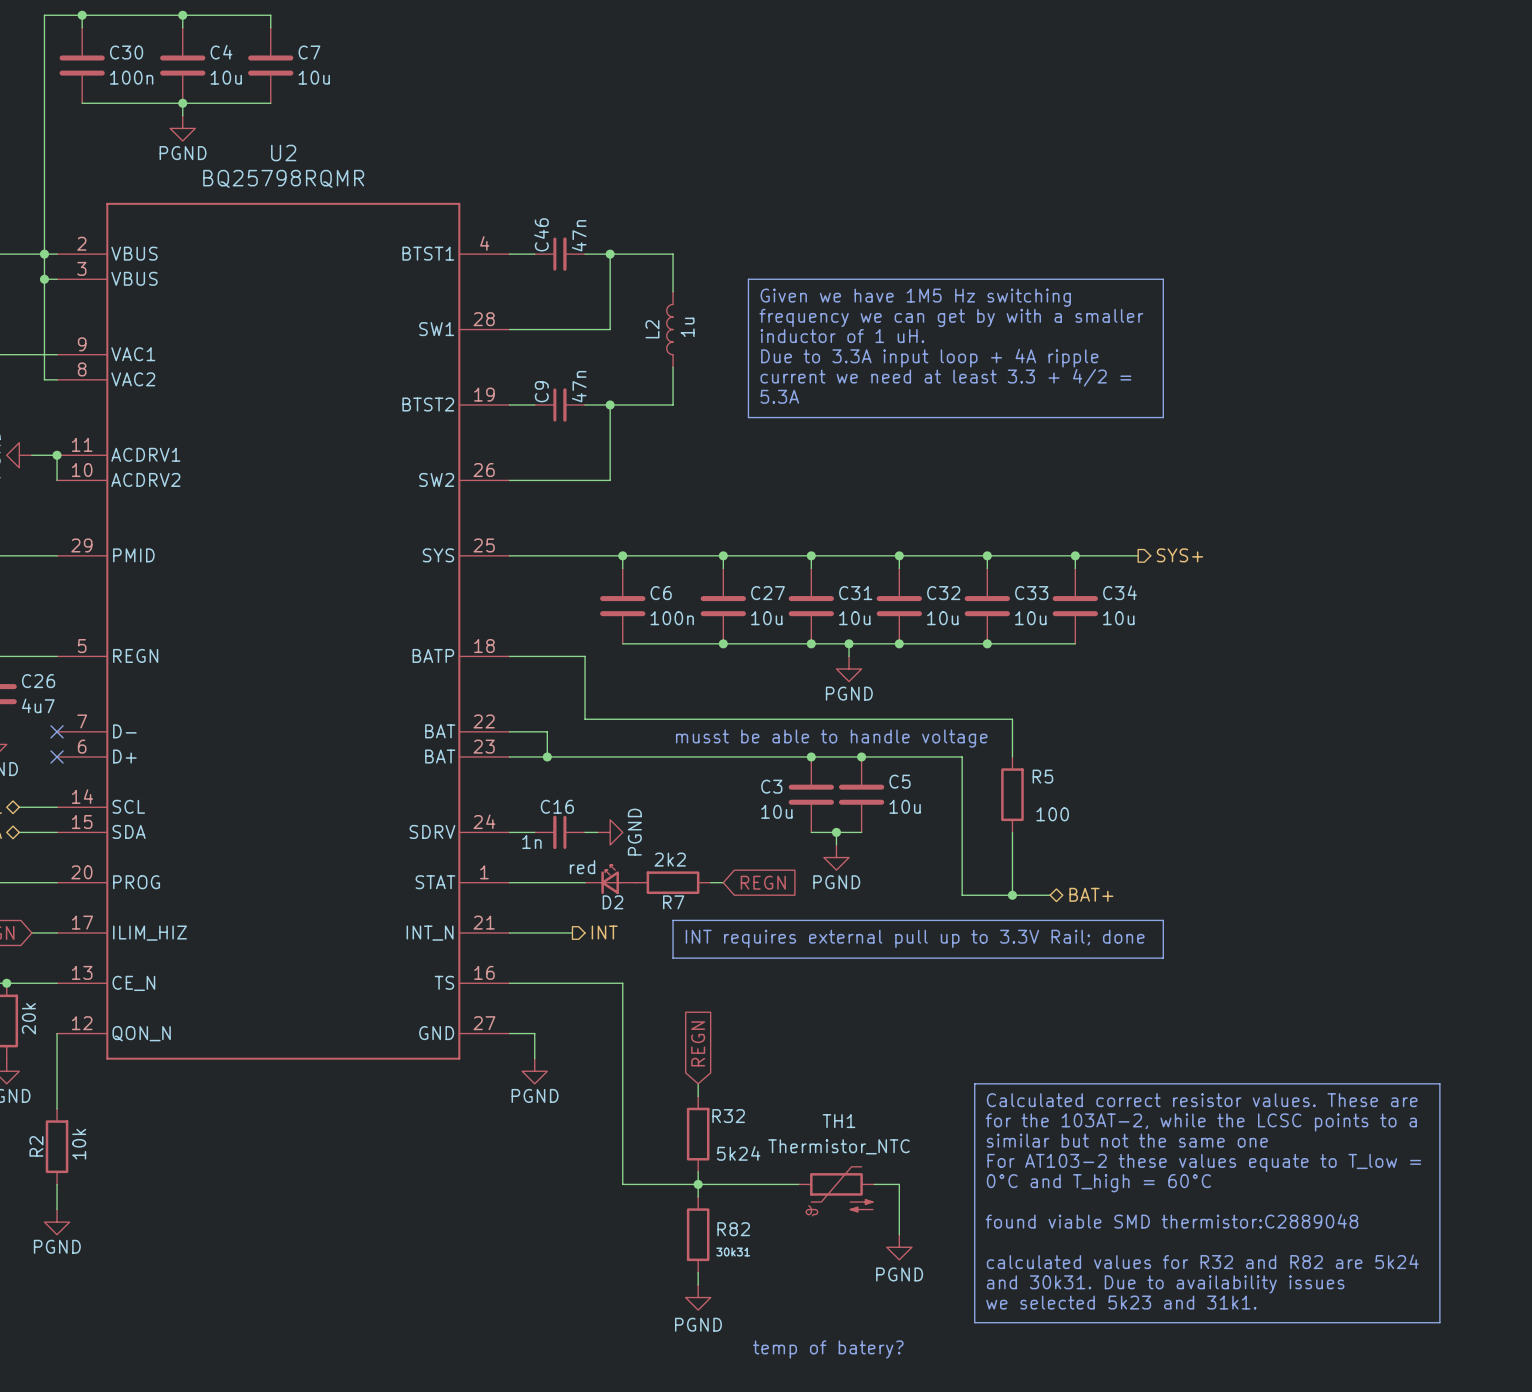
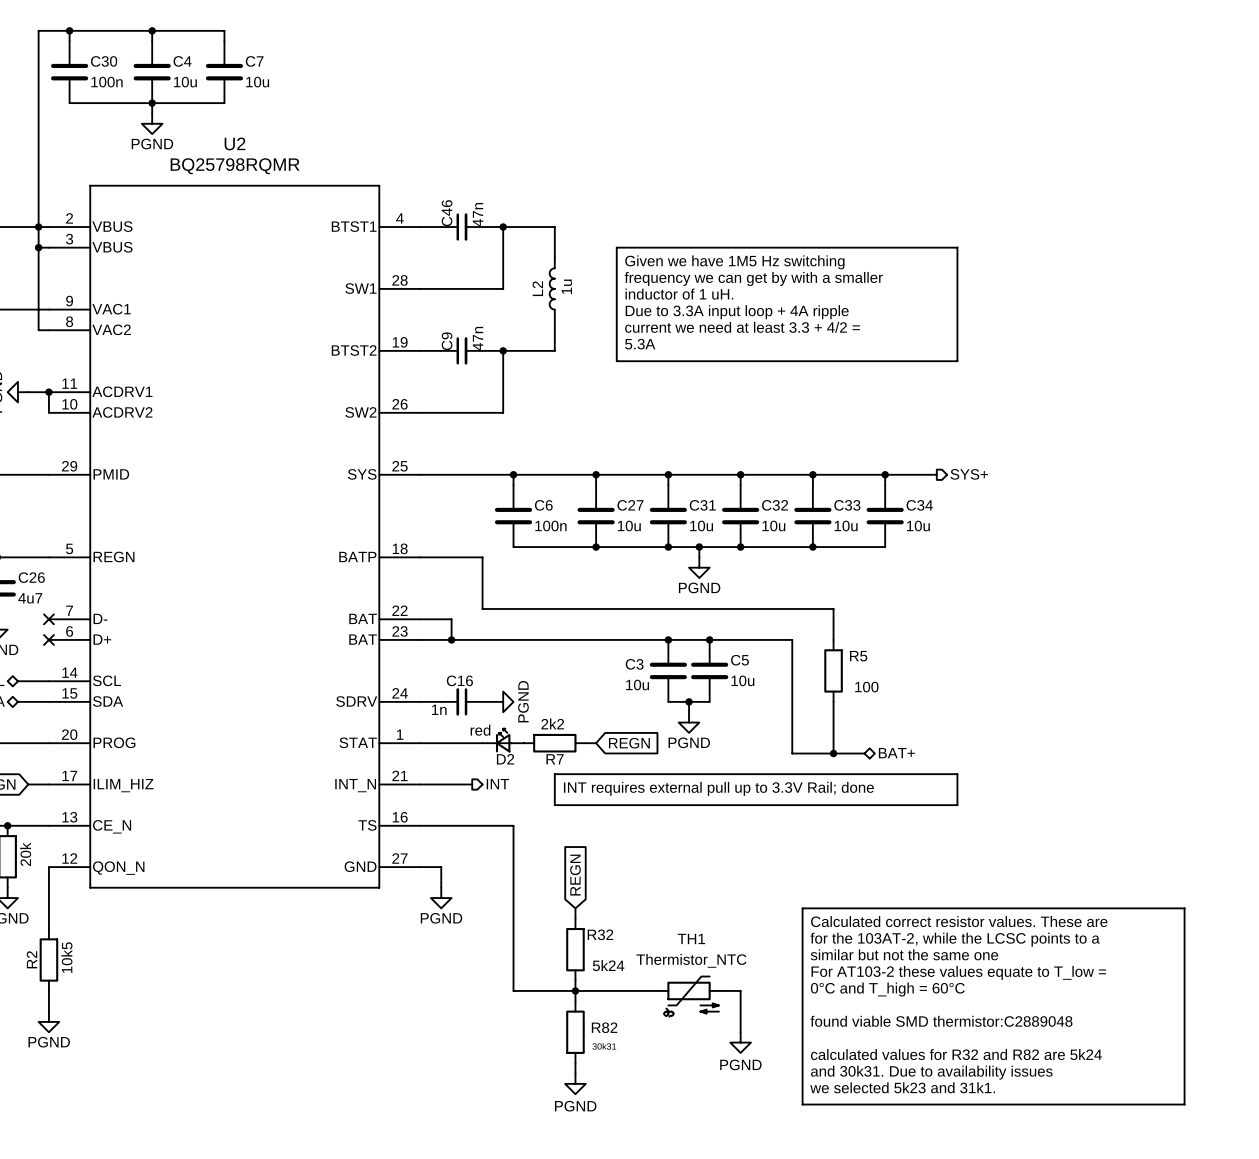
text: musst be able to handle voltage (831, 738) -> none
R2 value: 10k (79, 1144) -> 10k5 (66, 957)
text: temp of batery? (828, 1349) -> none

